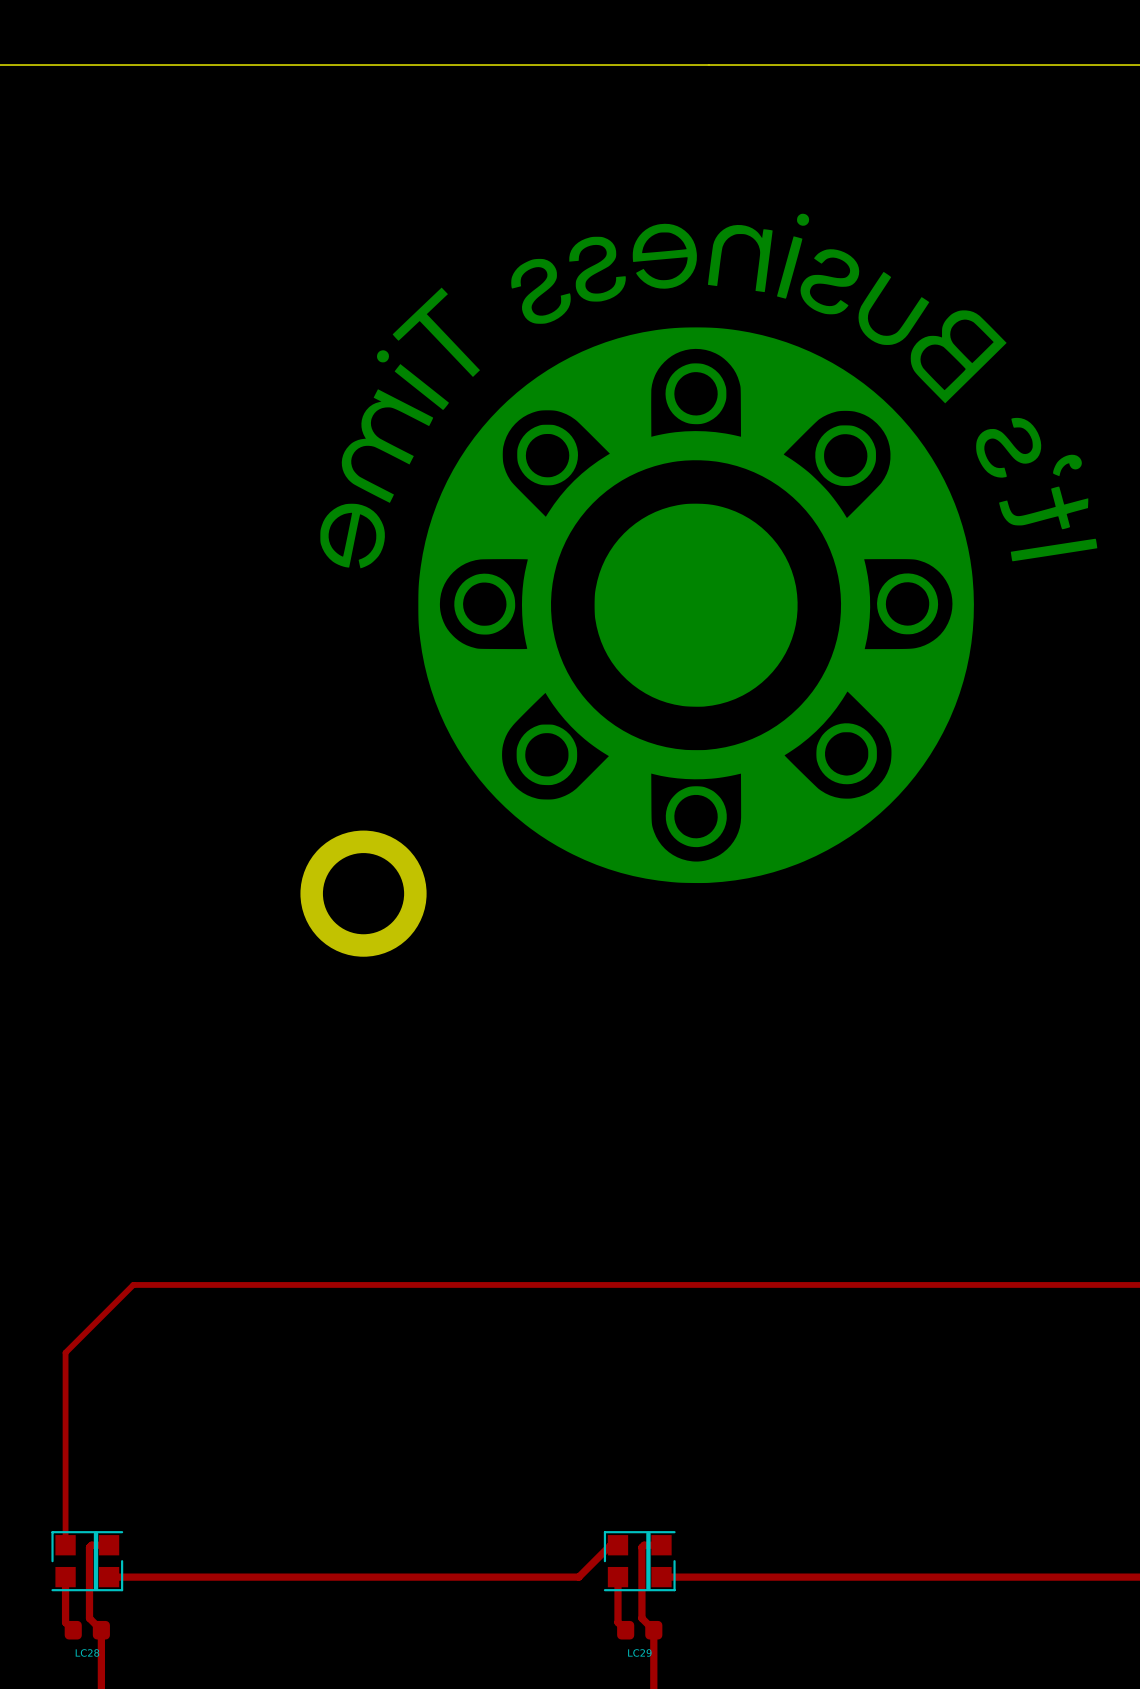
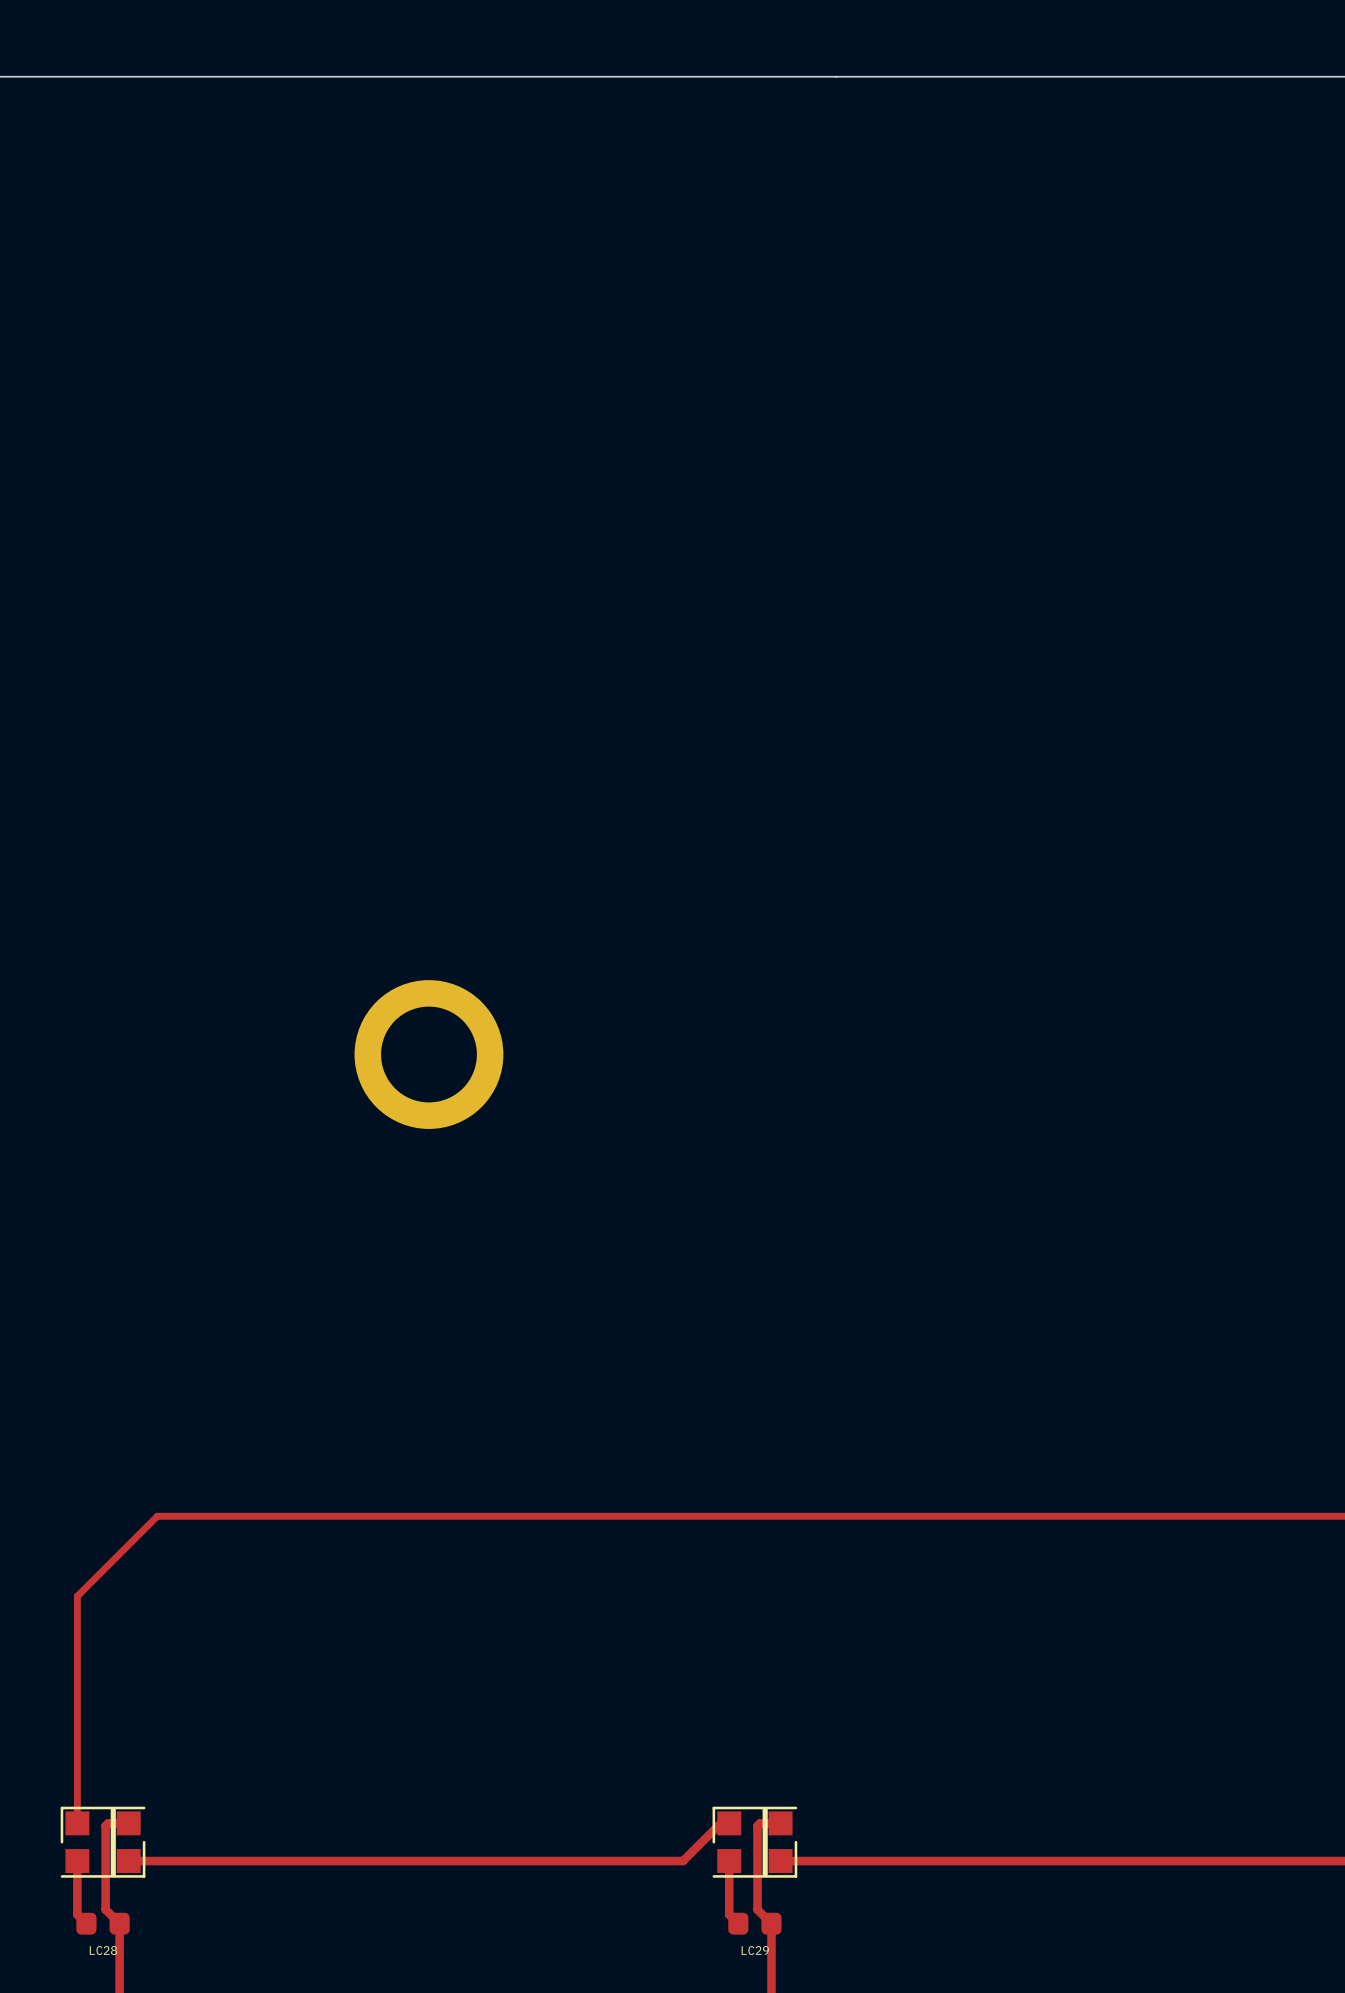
drawing: [320, 213, 1098, 884] -> none

